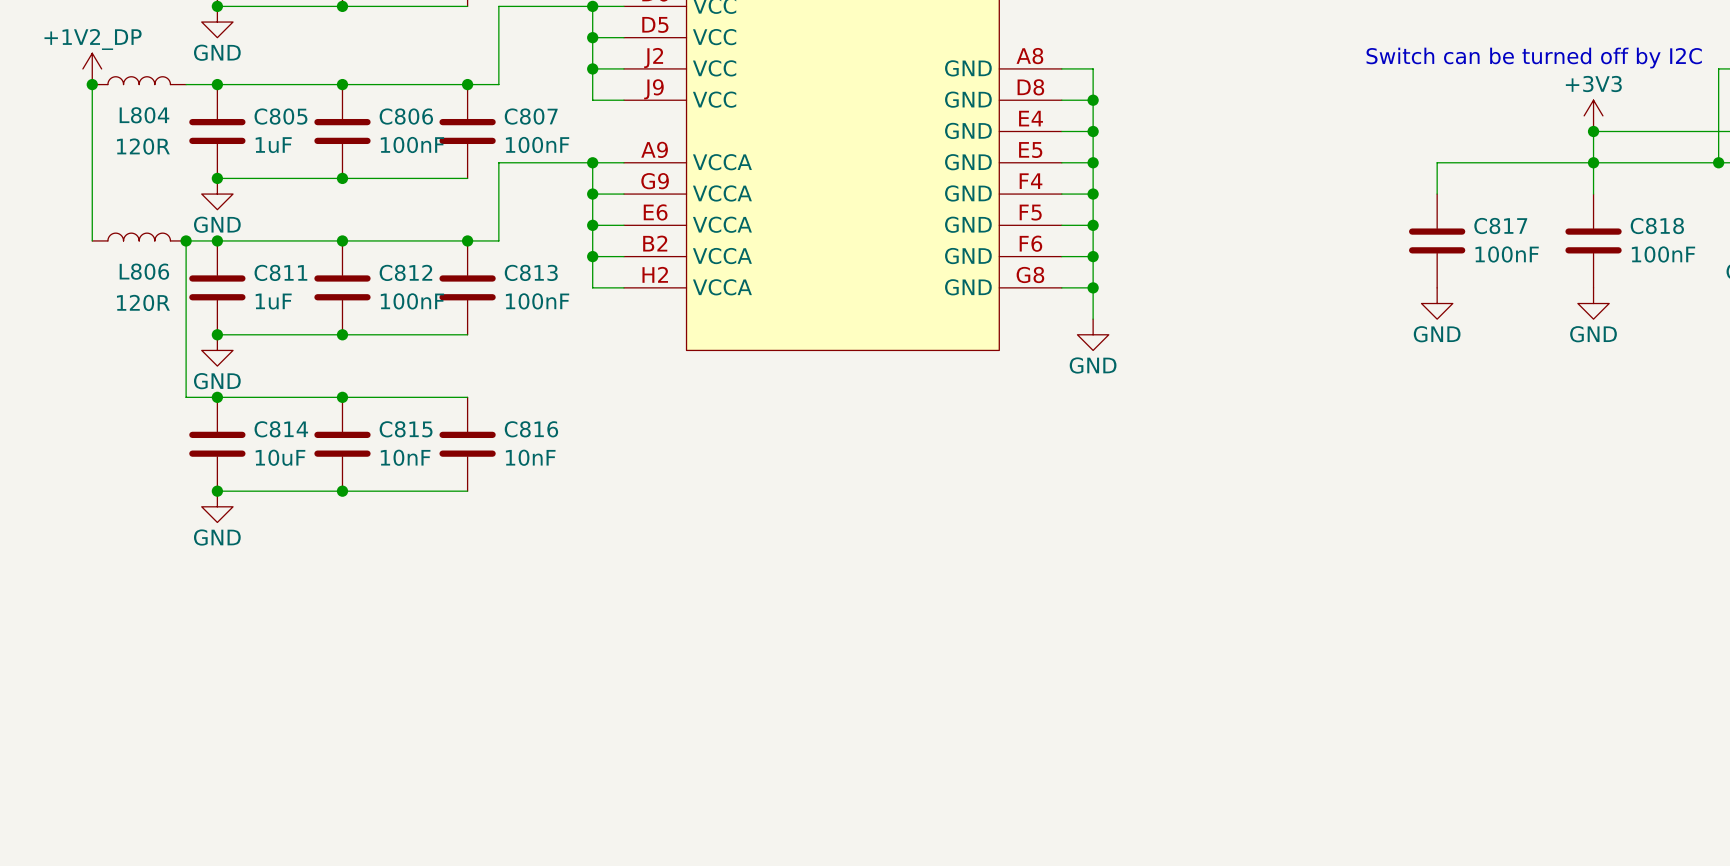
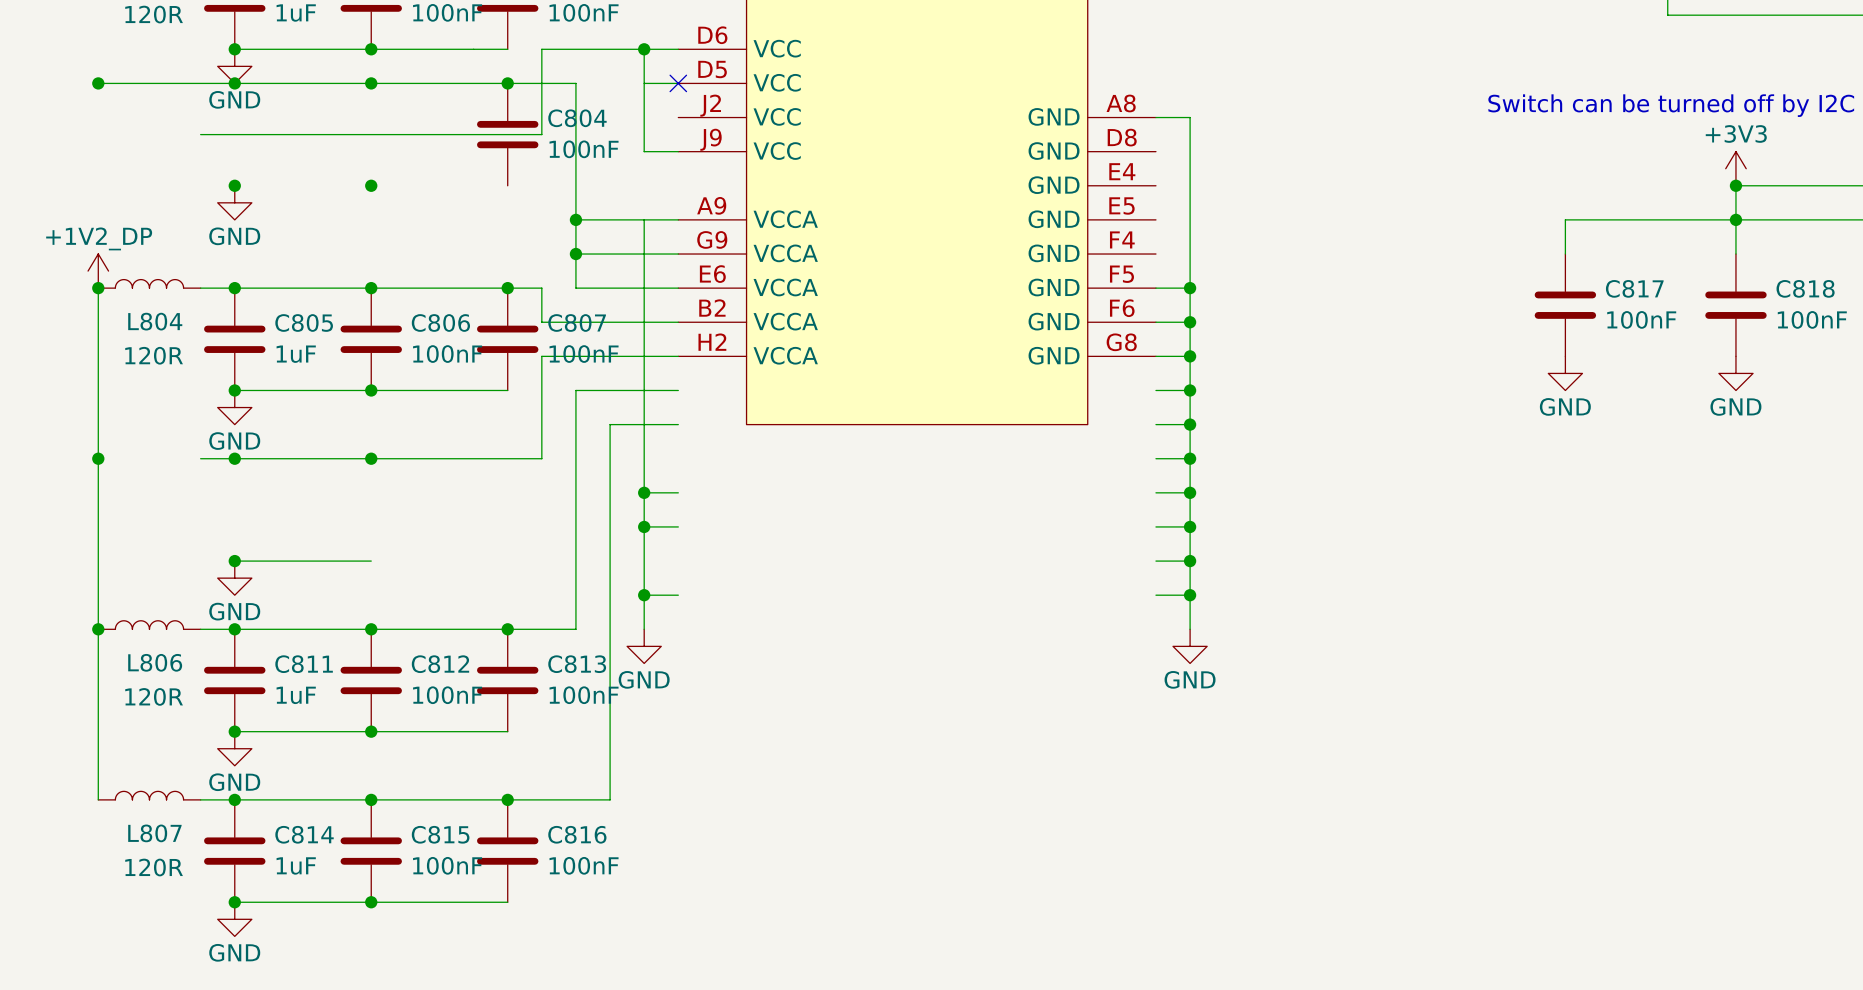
wire: none -> (98, 83) (575, 83) (575, 288) (644, 288)
junction: none -> (234, 83)
junction: none -> (371, 83)
junction: (592, 37) -> none
no-connect mark: none -> (678, 83)
power symbol position: +1V2_DP (92, 68) -> +1V2_DP (98, 271)
wire: (592, 68) (623, 68) -> none
junction: (592, 68) -> none
L804 position: (139, 80) -> (149, 283)
wire: (92, 84) (92, 225) -> none
junction position: (92, 84) -> (98, 83)
junction: (217, 84) -> none
junction: (342, 84) -> none
junction position: (467, 84) -> (507, 83)
C804: none -> 100nF (507, 134)
wire: (1061, 100) (1093, 100) -> (1155, 424) (1190, 424)
junction: (1093, 100) -> none
junction: none -> (234, 185)
C805 position: (217, 131) -> (234, 339)
junction: none -> (371, 185)
C806 position: (342, 131) -> (371, 339)
C807 position: (467, 131) -> (507, 339)
wire: (1061, 131) (1093, 131) -> (1155, 458) (1190, 458)
junction: (1093, 131) -> none
wire: (530, 162) (498, 162) (498, 225) -> (200, 288) (541, 288)
junction: none -> (575, 219)
junction: (592, 162) -> none
wire: (1061, 162) (1093, 162) -> (1155, 492) (1190, 492)
junction: (1093, 162) -> none
wire: (217, 178) (467, 178) -> (234, 390) (507, 390)
junction: (217, 178) -> none
junction: (342, 178) -> none
power symbol position: GND (217, 194) -> GND (234, 202)
wire: none -> (575, 254) (644, 254)
junction: none -> (575, 254)
junction: (592, 194) -> none
wire: (1061, 194) (1093, 194) -> (1155, 526) (1190, 526)
junction: (1093, 194) -> none
junction: none -> (98, 288)
junction: (592, 225) -> none
L806 position: (139, 237) -> (149, 625)
wire: none -> (98, 305) (98, 799)
junction: (186, 240) -> none
junction position: (217, 240) -> (234, 288)
junction position: (342, 240) -> (371, 288)
junction position: (467, 240) -> (507, 288)
wire: (498, 240) (186, 240) (186, 397) (467, 397) -> (541, 305) (541, 322) (644, 322)
junction: (592, 256) -> none
C811 position: (217, 287) -> (234, 680)
C812 position: (342, 287) -> (371, 680)
C813 position: (467, 287) -> (507, 680)
wire: none -> (678, 390) (575, 390) (575, 629) (200, 629)
wire: none -> (1155, 390) (1190, 390) (1190, 629)
junction: none -> (1190, 390)
wire: (217, 334) (467, 334) -> none
junction position: (217, 334) -> (234, 390)
junction position: (342, 334) -> (371, 390)
power symbol position: GND (1093, 334) -> GND (1190, 646)
power symbol position: GND (217, 350) -> GND (234, 407)
wire: none -> (678, 424) (610, 424) (610, 799) (200, 799)
junction: none -> (1190, 424)
junction: none -> (98, 458)
wire: none -> (200, 458) (541, 458) (541, 356) (644, 356) (644, 629)
junction: none -> (1190, 458)
junction position: (217, 397) -> (234, 458)
junction position: (342, 397) -> (371, 458)
wire: none -> (644, 492) (678, 492)
junction: none -> (644, 492)
junction: none -> (1190, 492)
C814 position: (217, 444) -> (234, 851)
C815 position: (342, 444) -> (371, 851)
C816 position: (467, 444) -> (507, 851)
wire: none -> (644, 526) (678, 526)
junction: none -> (644, 526)
junction: none -> (1190, 526)
C814 value: 10uF (280, 457) -> 1uF (296, 865)
C815 value: 10nF (405, 457) -> 100nF (447, 865)
C816 value: 10nF (530, 457) -> 100nF (584, 865)
wire: none -> (234, 561) (371, 561)
wire: none -> (1155, 561) (1190, 561)
junction: none -> (1190, 561)
wire: (217, 491) (467, 491) -> (234, 731) (507, 731)
junction position: (217, 491) -> (234, 561)
junction position: (342, 491) -> (371, 629)
power symbol position: GND (217, 506) -> GND (234, 578)
wire: none -> (644, 595) (678, 595)
junction: none -> (644, 595)
wire: none -> (1155, 595) (1190, 595)
junction: none -> (1190, 595)
junction: none -> (98, 629)
junction: none -> (234, 629)
junction: none -> (507, 629)
power symbol: none -> GND (644, 646)
junction: none -> (234, 731)
junction: none -> (371, 731)
power symbol: none -> GND (234, 748)
L807: none -> 120R (149, 795)
junction: none -> (234, 799)
junction: none -> (371, 799)
junction: none -> (507, 799)
wire: none -> (234, 902) (507, 902)
junction: none -> (234, 902)
junction: none -> (371, 902)
power symbol: none -> GND (234, 919)

